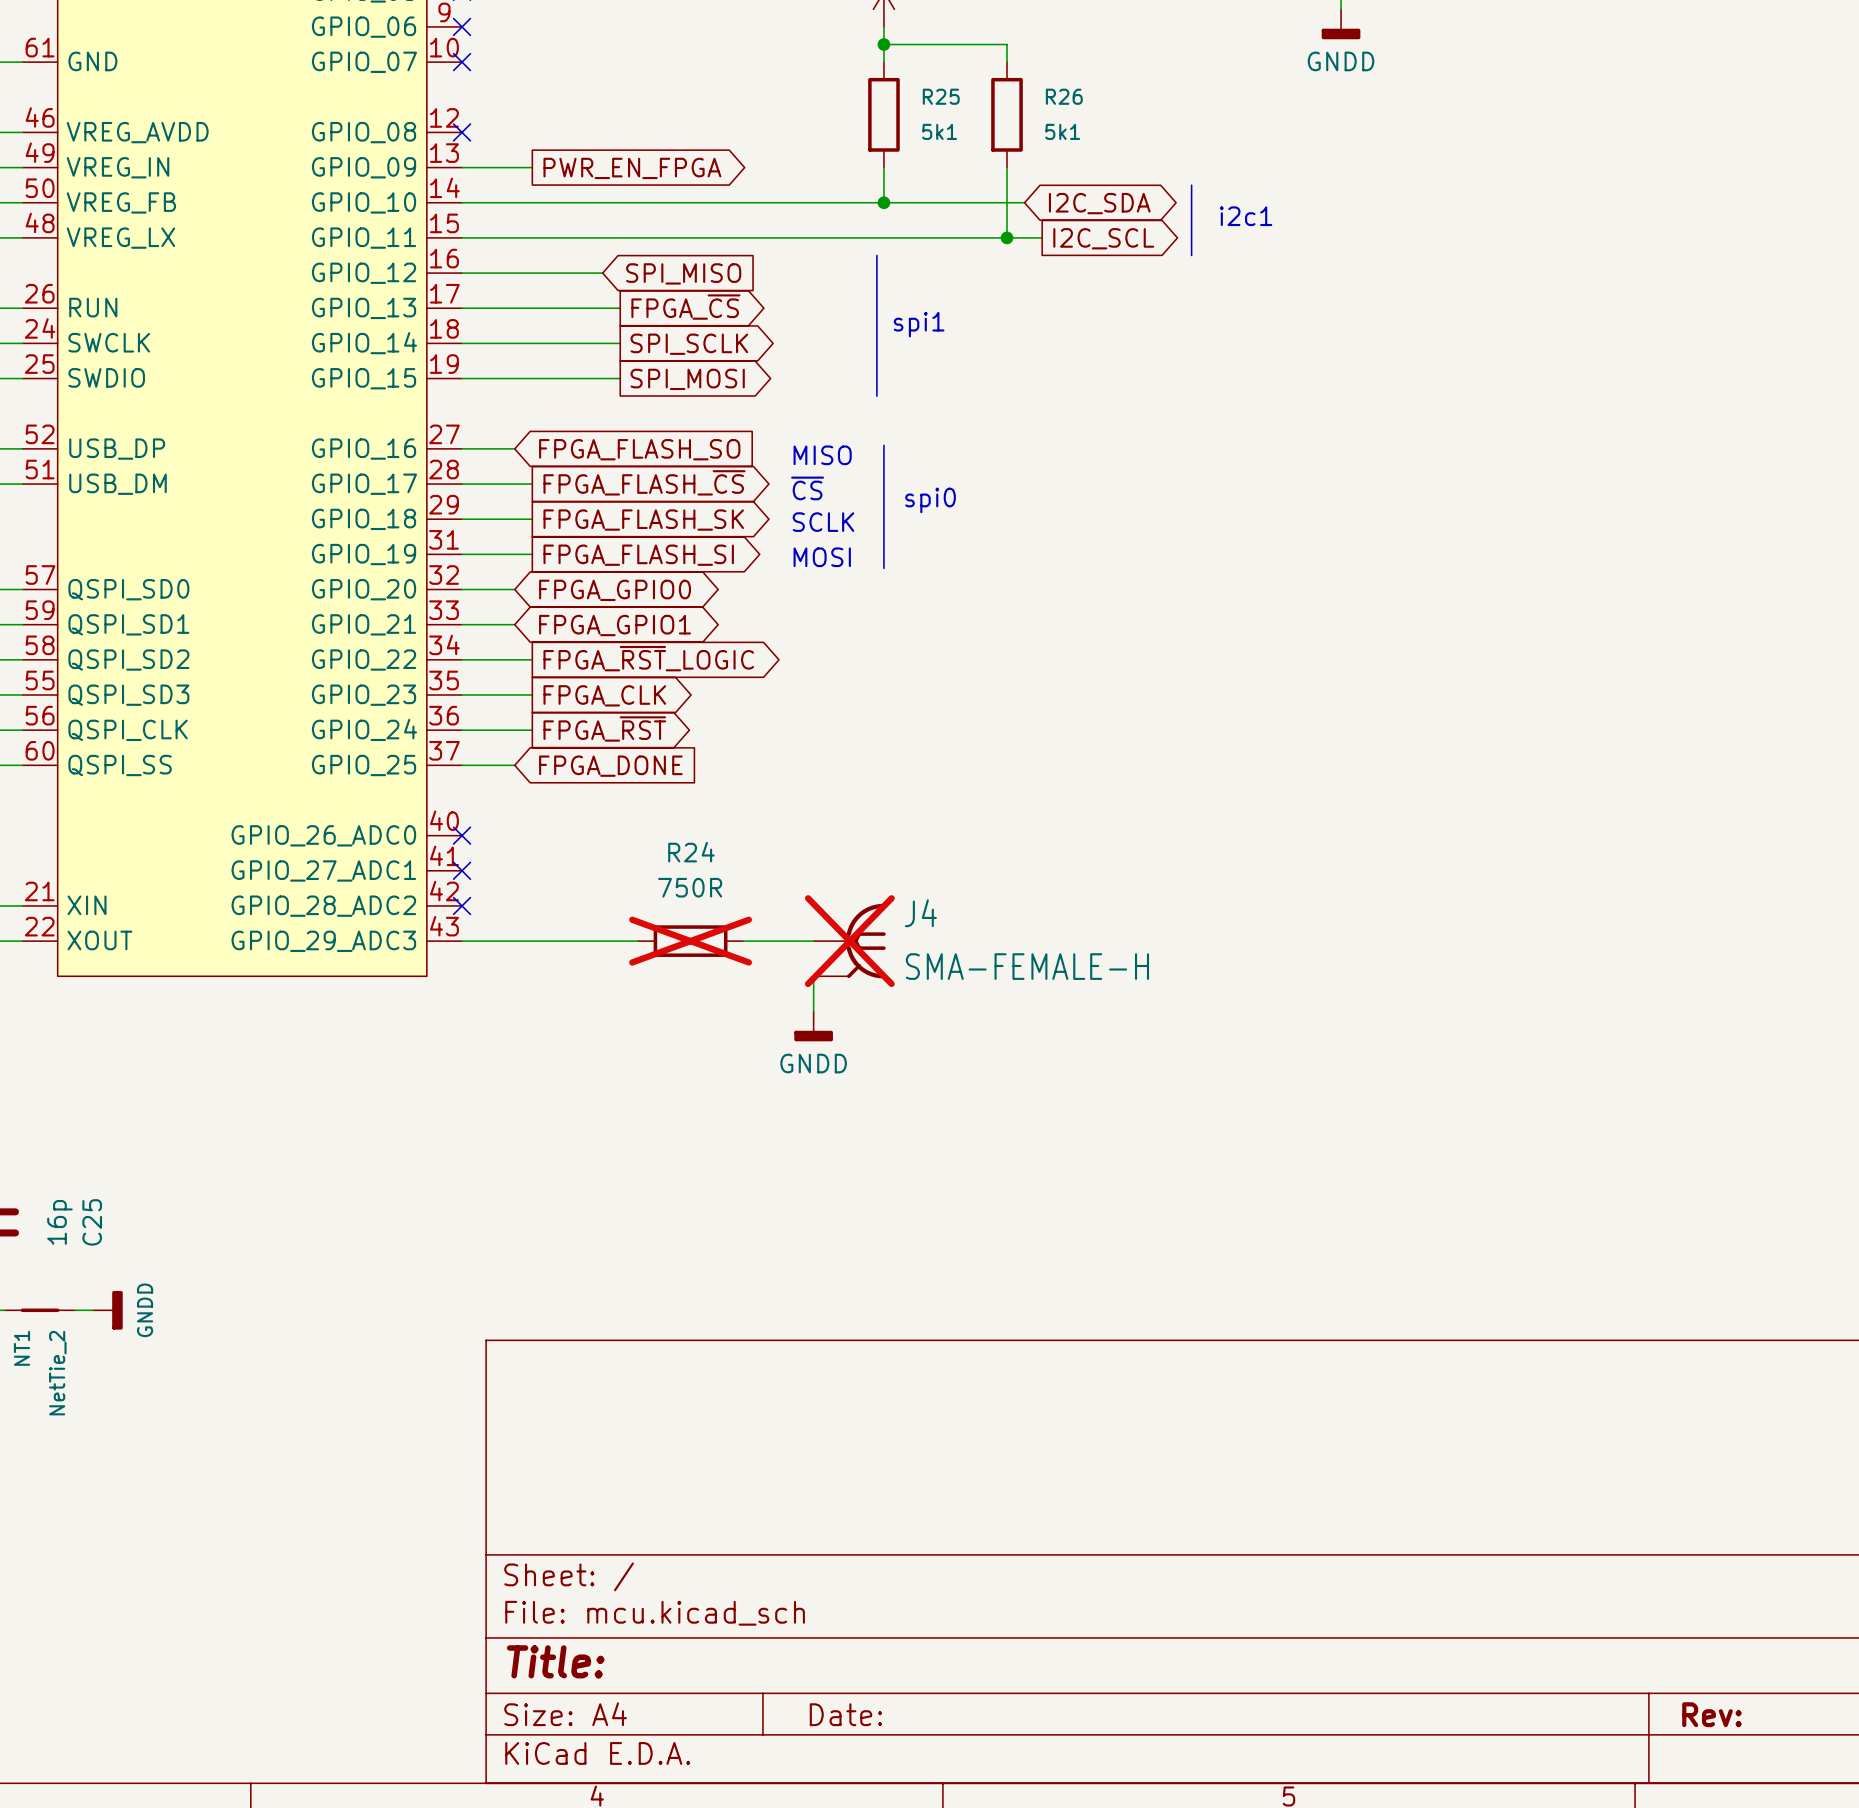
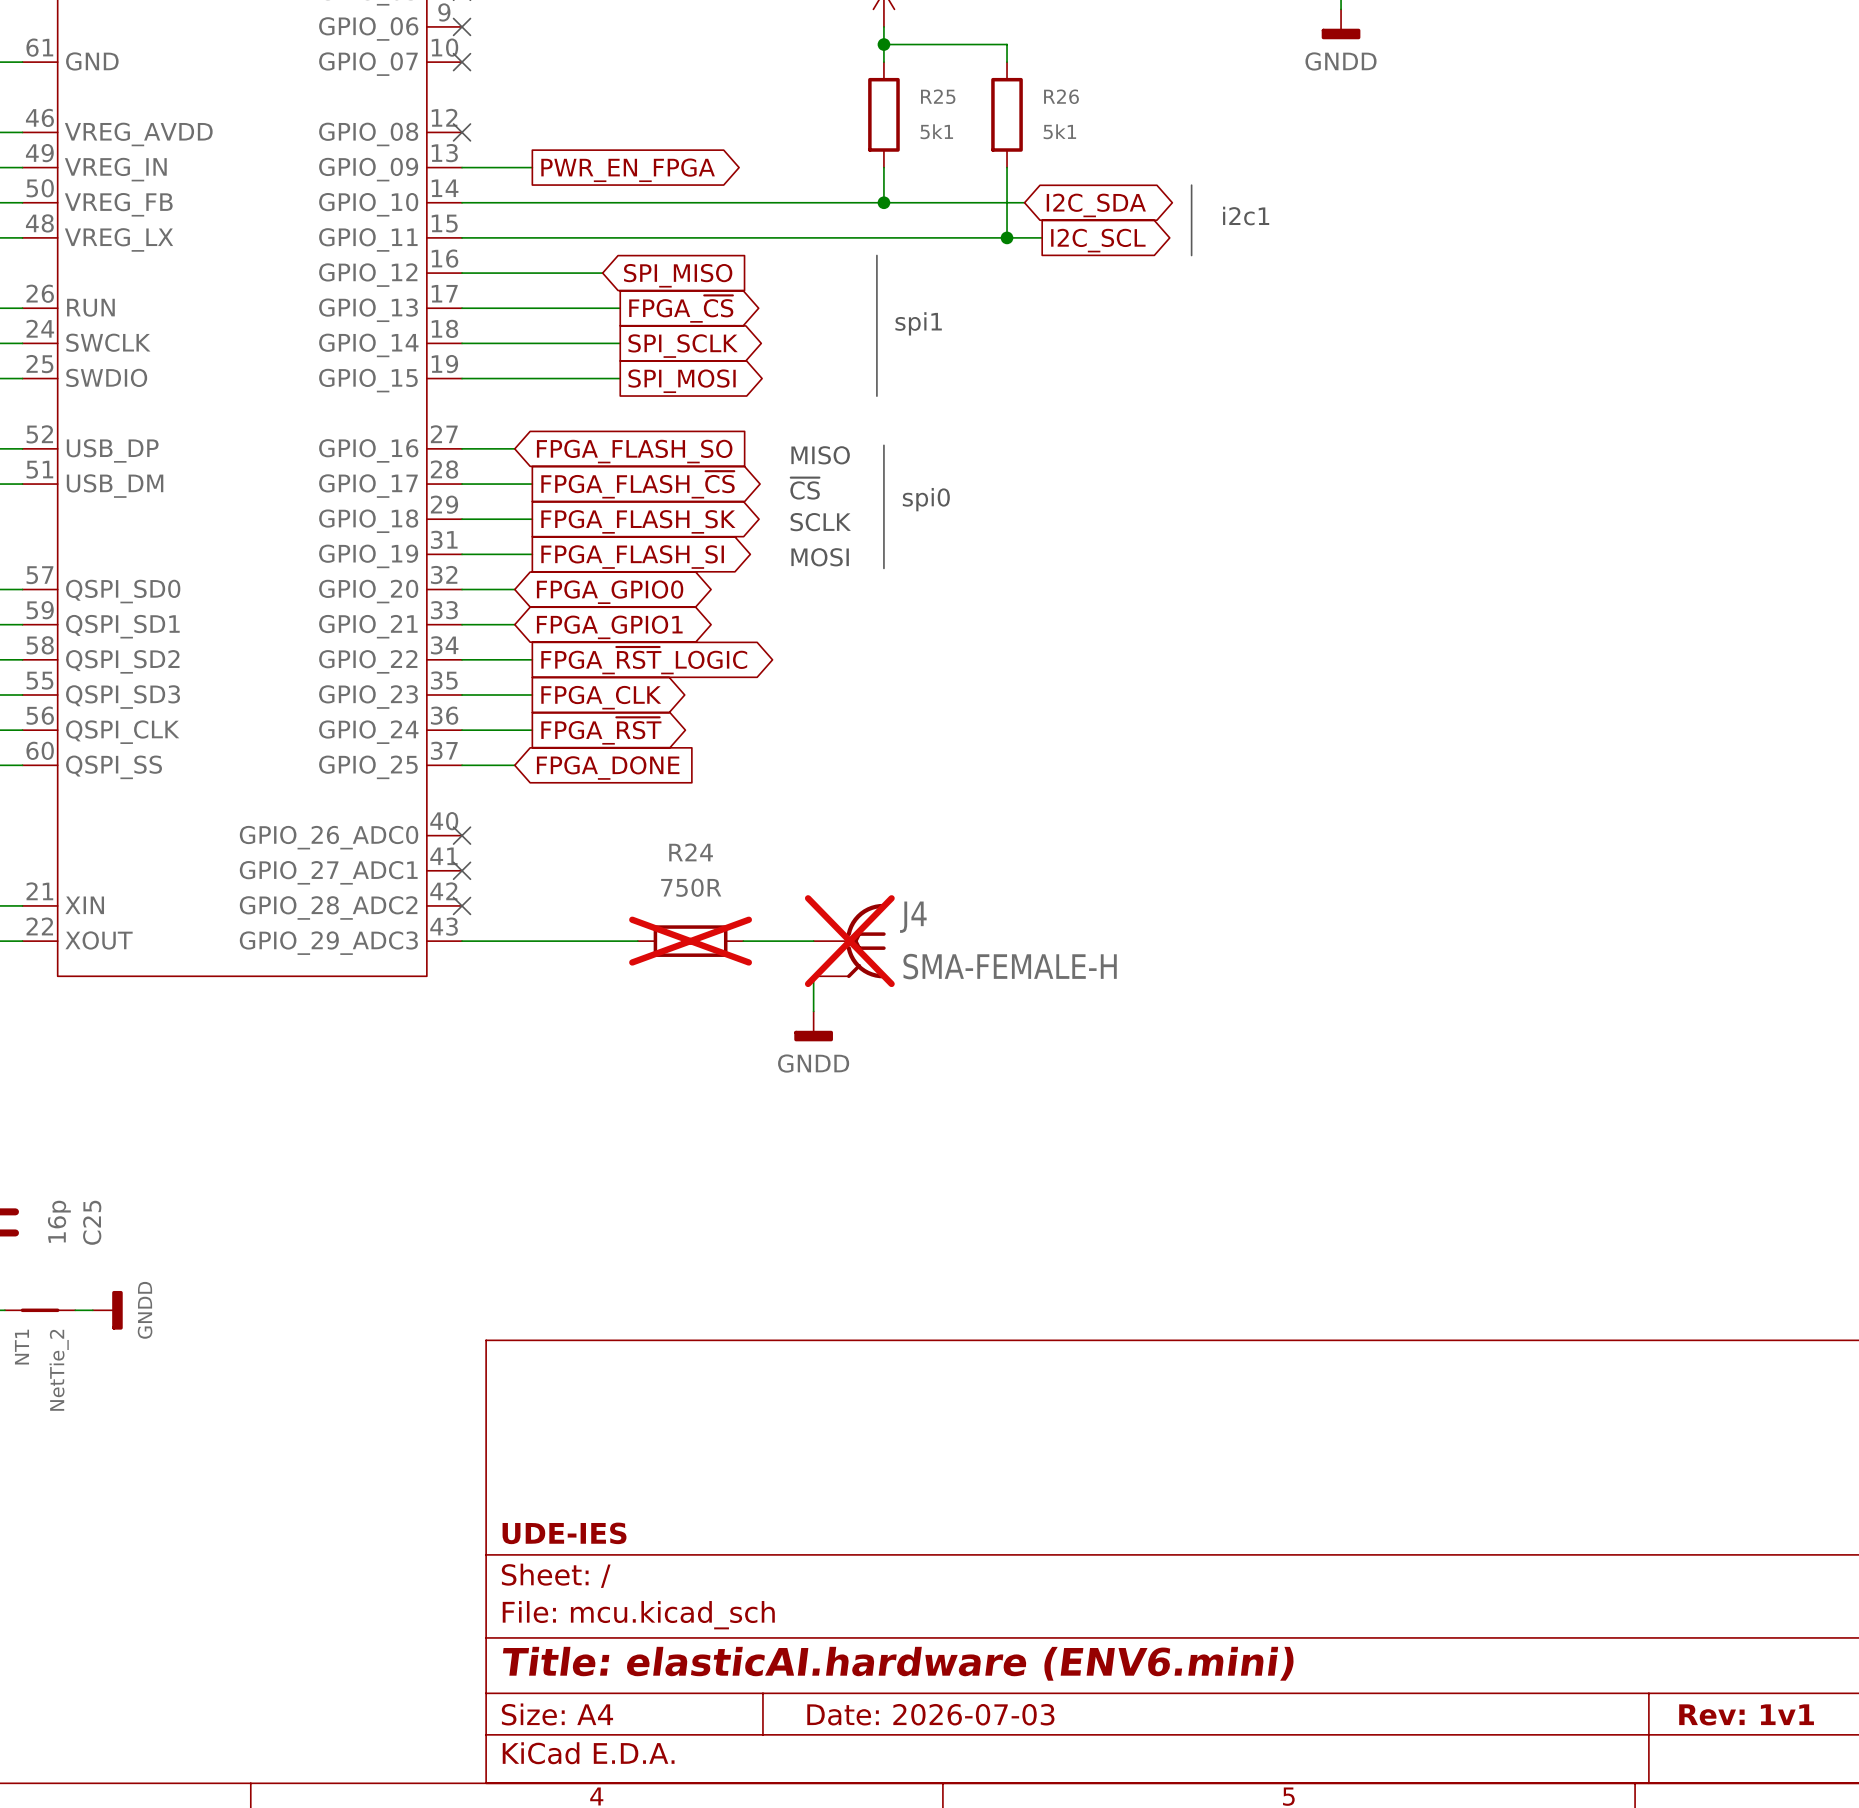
title block: none -> UDE-IES (564, 1533)
title block: Title: (555, 1661) -> Title: elasticAI.hardware (ENV6.mini) (898, 1663)
title block: Date: (845, 1714) -> Date: 2026-07-03 (930, 1714)
title block: Rev: (1711, 1714) -> Rev: 1v1 (1746, 1714)

